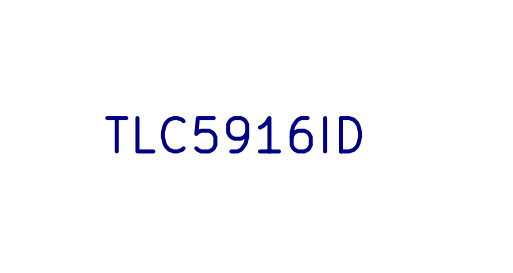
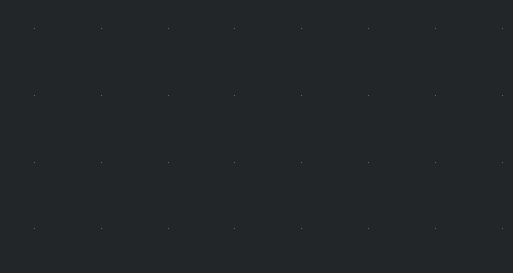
text: TLC5916ID (233, 134) -> none

